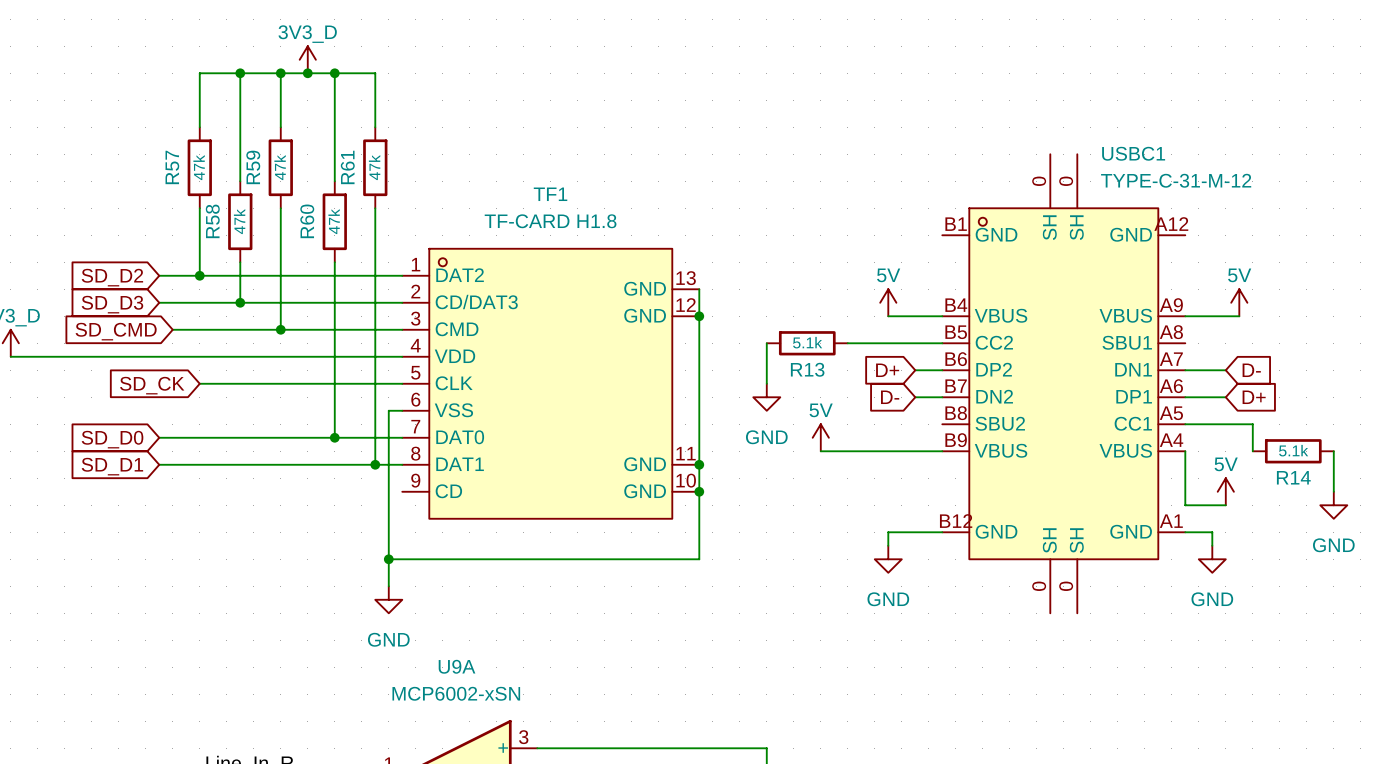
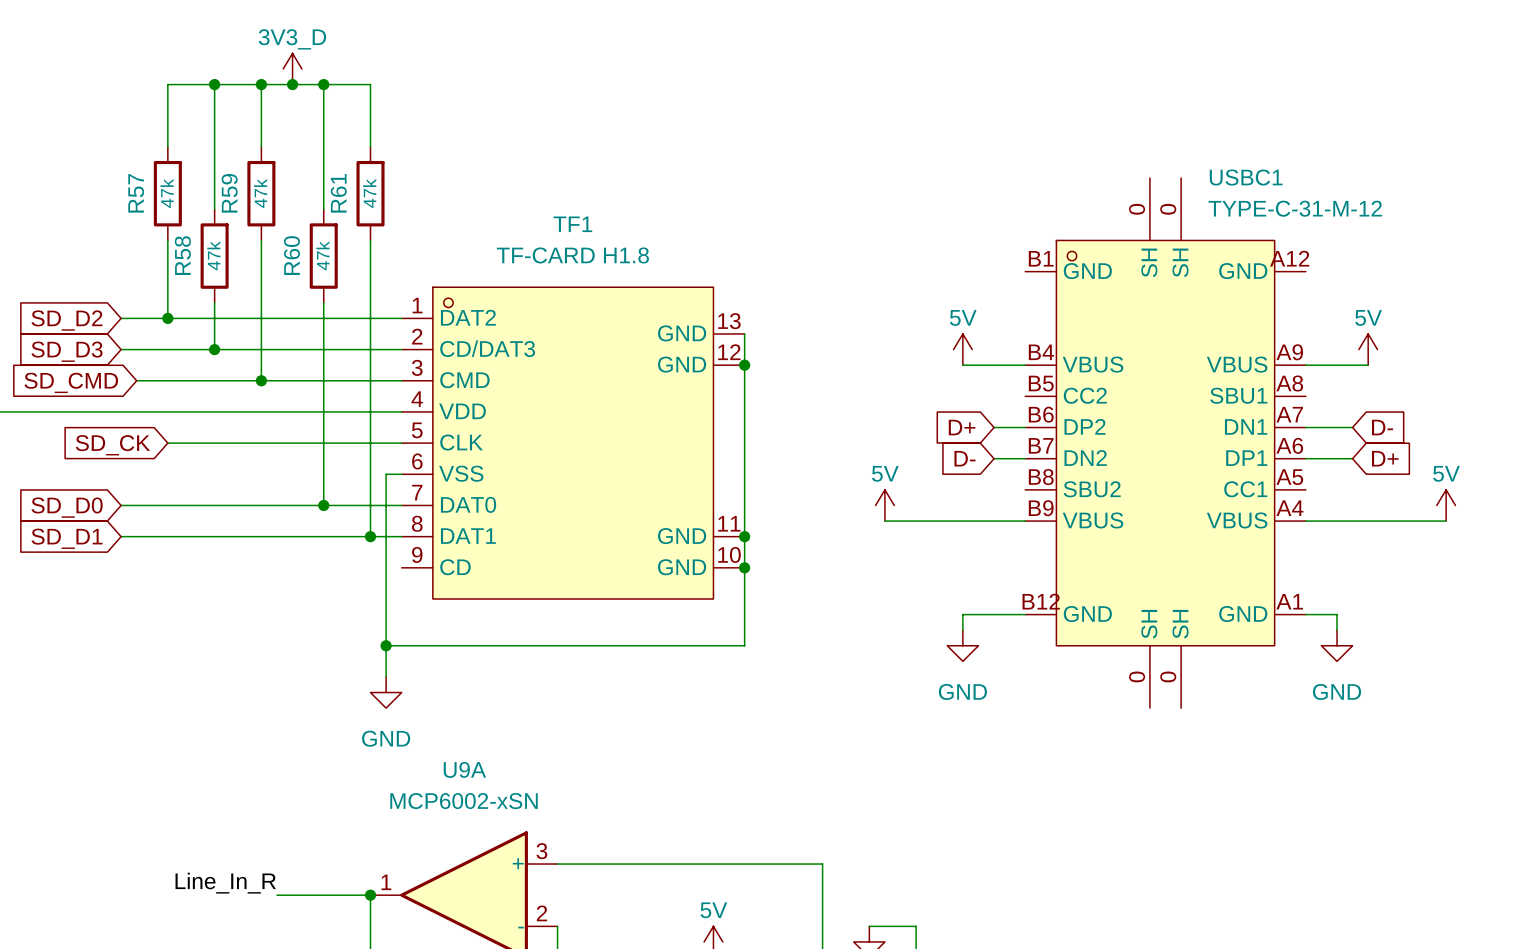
wire: (766, 343) (766, 383) -> none
R13: 5.1k (807, 343) -> none
wire: (847, 343) (942, 343) -> none
power symbol: GND (766, 397) -> none
wire: (1185, 424) (1252, 424) (1252, 451) -> none
wire: (1185, 451) (1185, 505) (1225, 505) -> (1305, 521) (1446, 521)
R14: 5.1k (1293, 451) -> none
wire: (1333, 451) (1333, 491) -> none
power symbol position: 5V (1225, 491) -> 5V (1446, 505)
power symbol: GND (1333, 505) -> none

